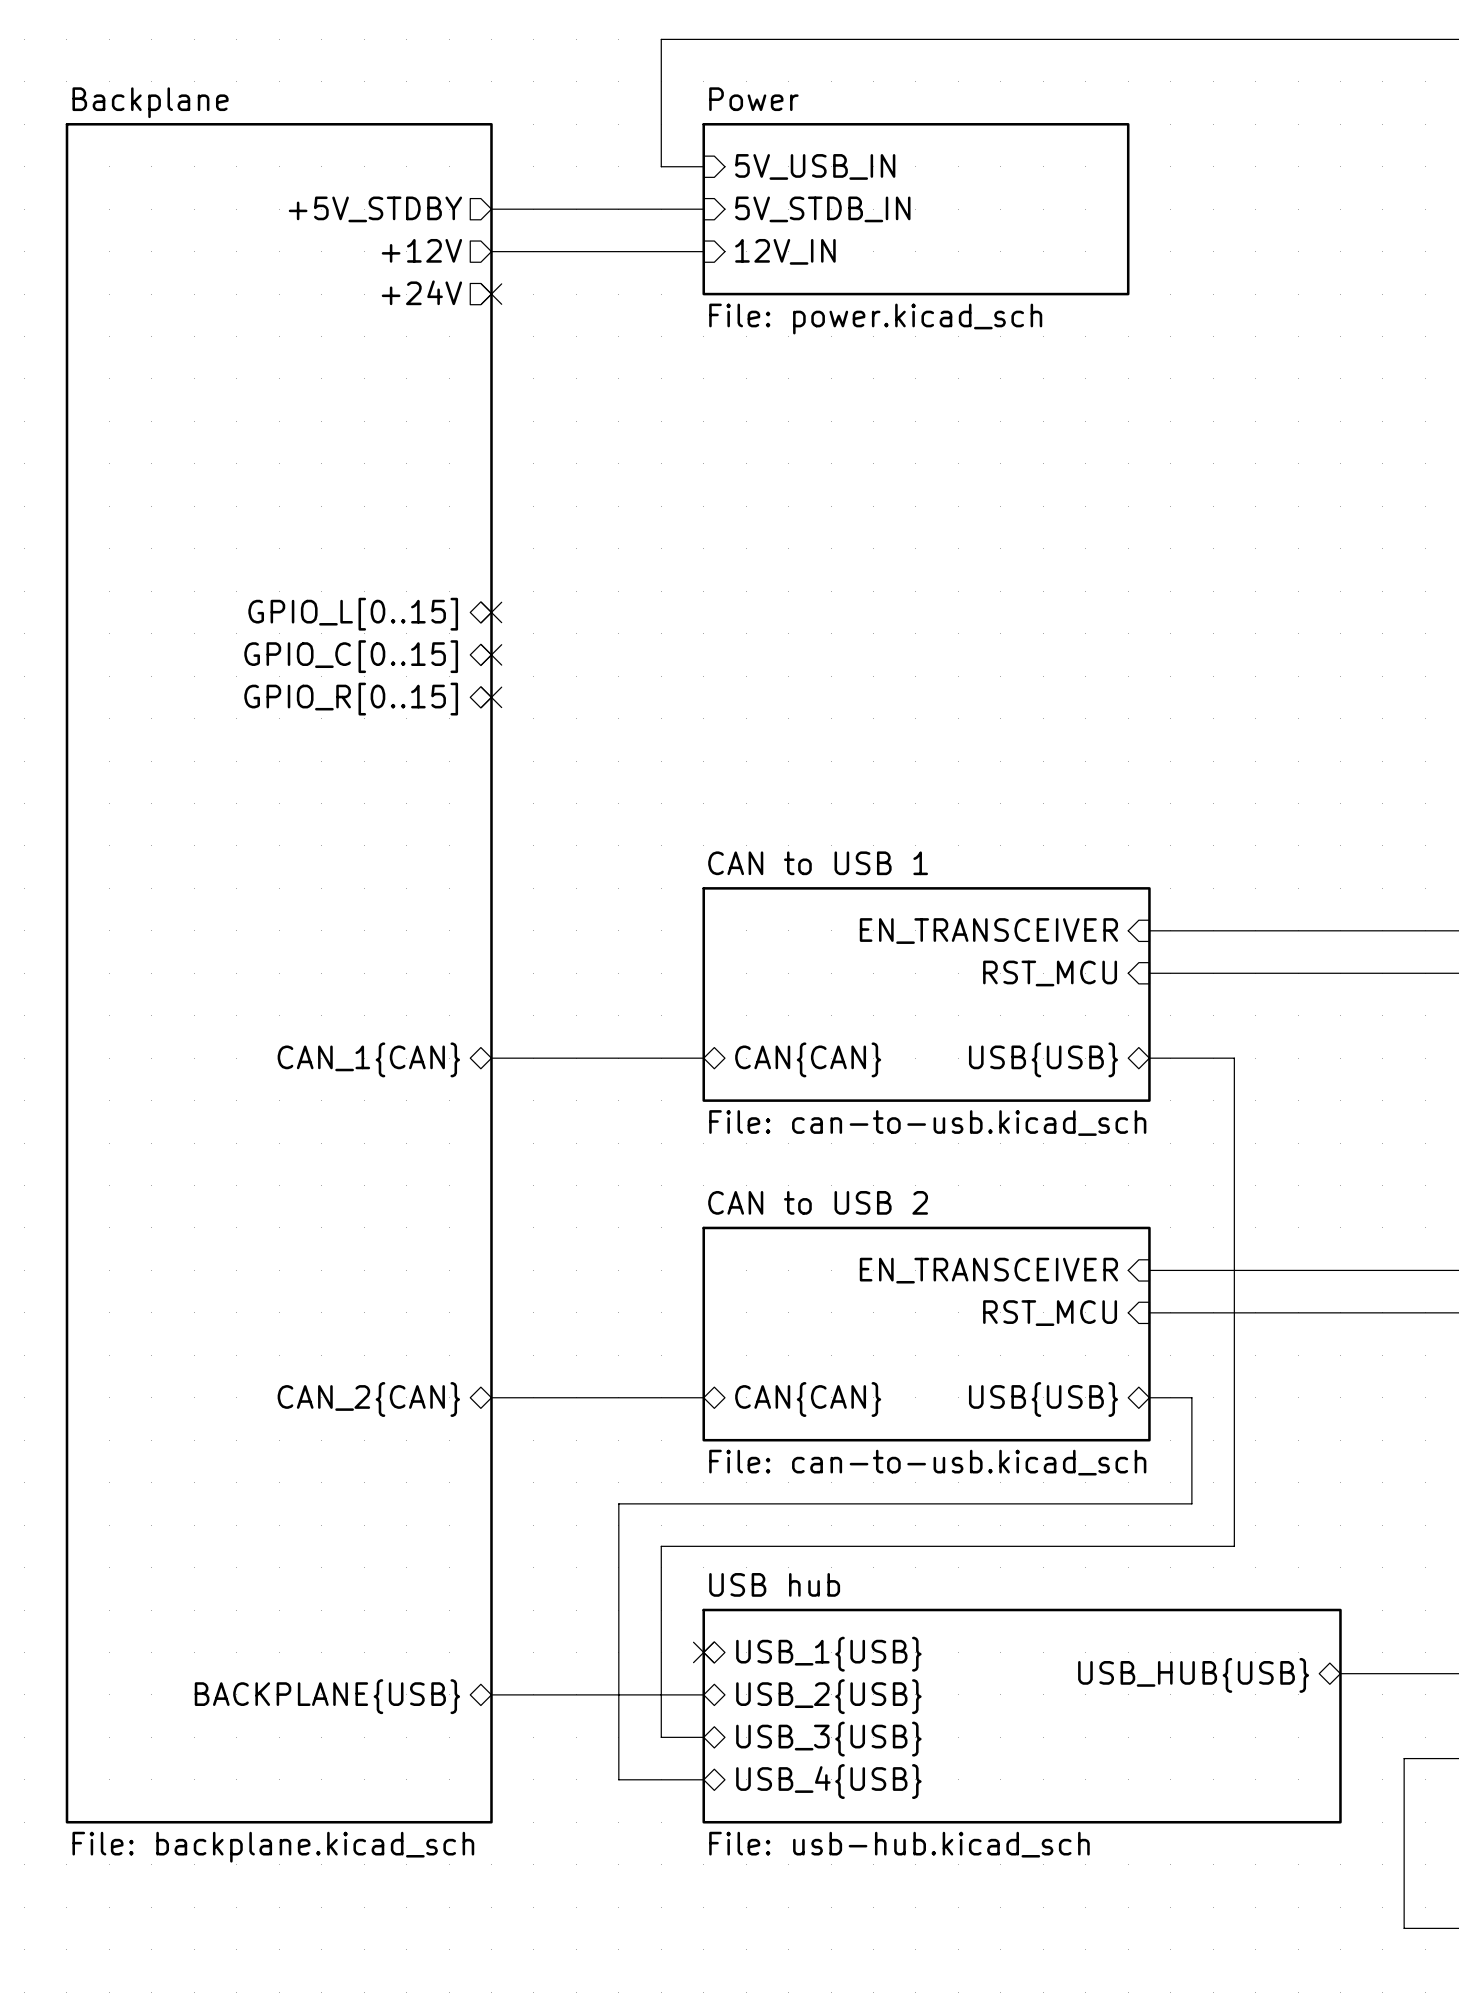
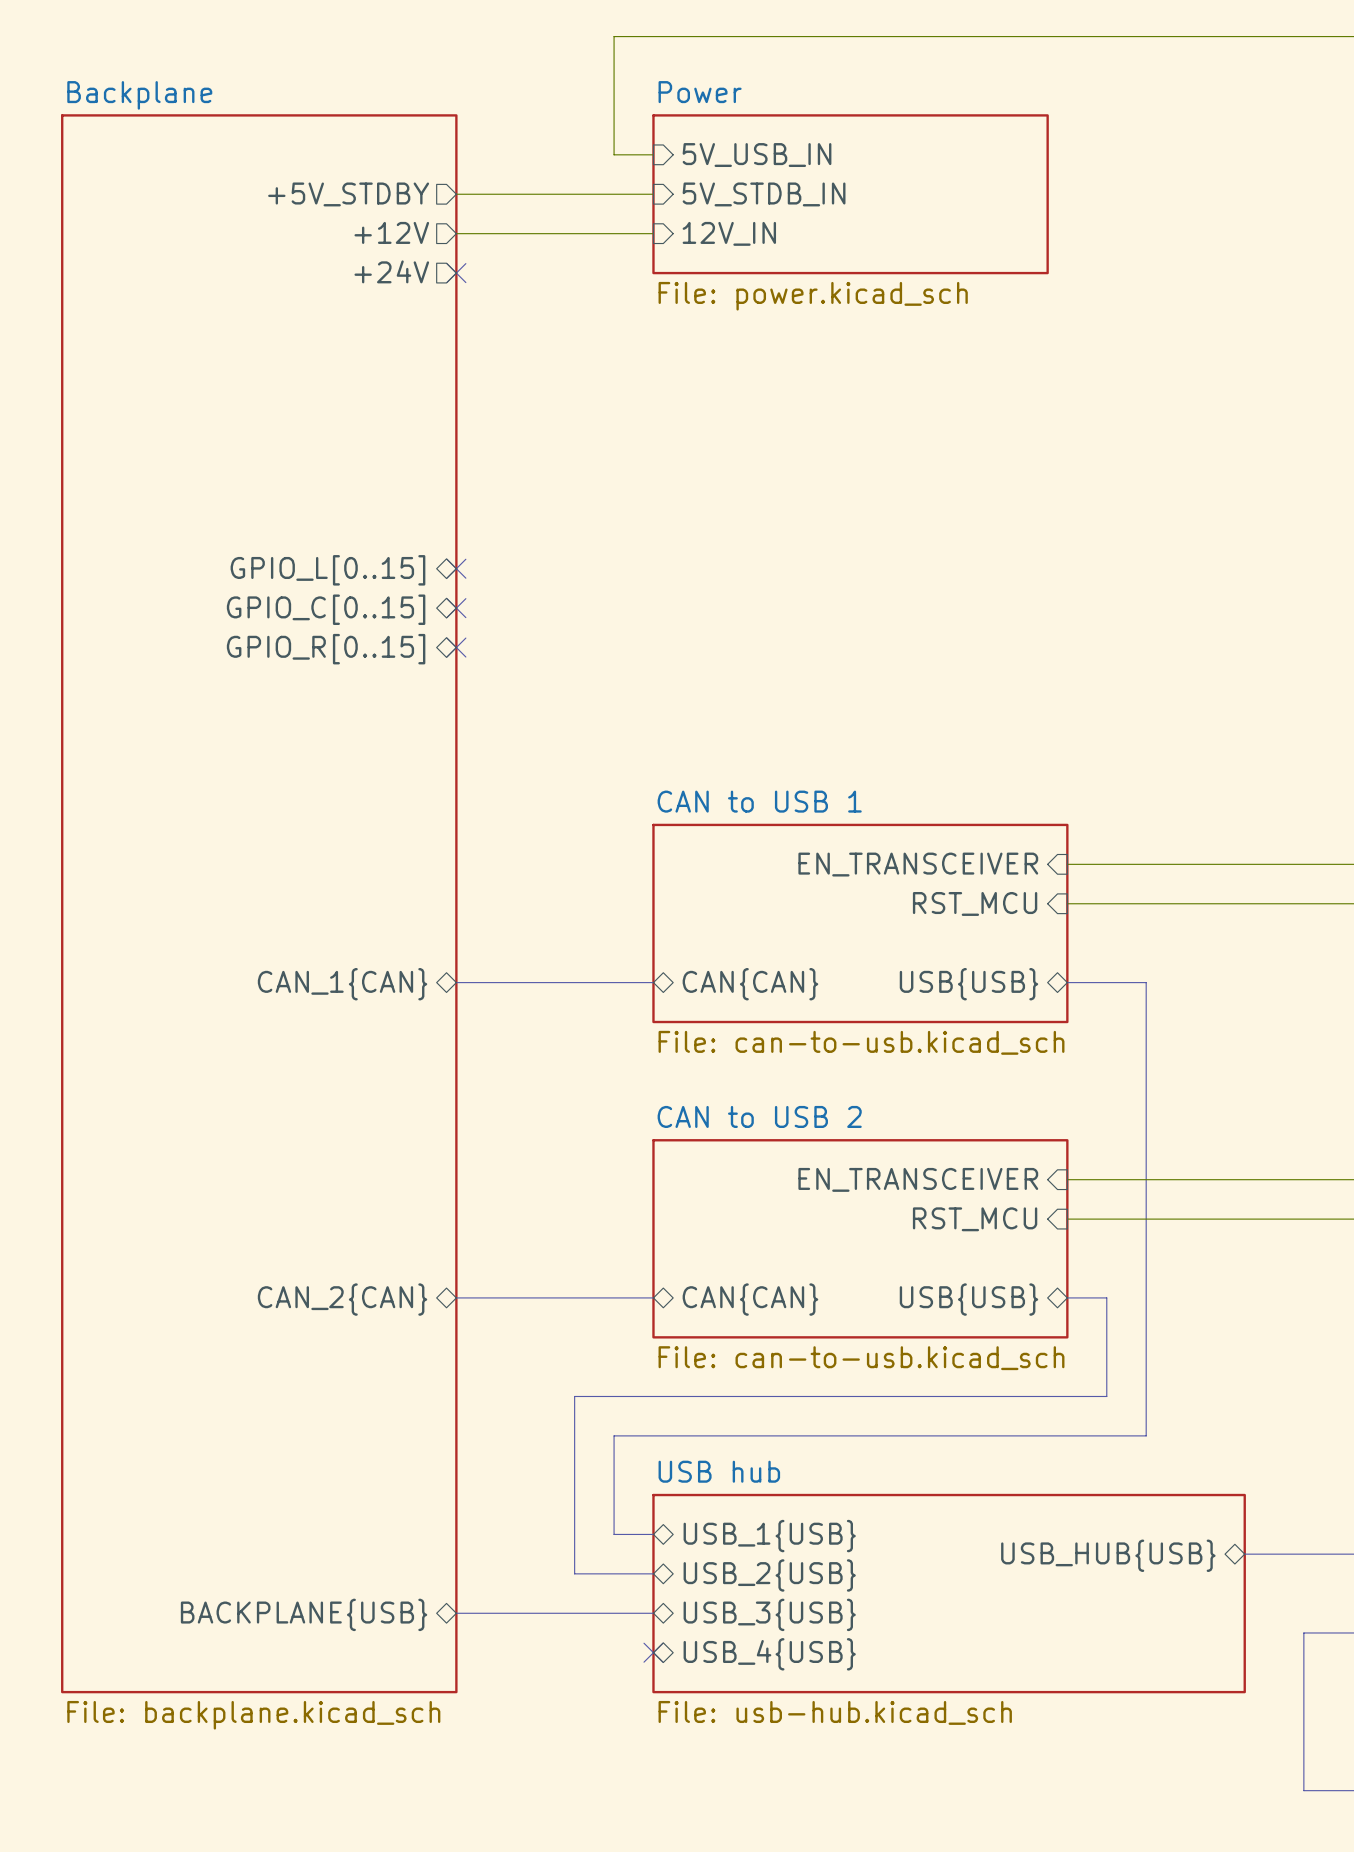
bus: (661, 1652) (661, 1737) -> (614, 1534) (653, 1534)
no-connect mark: (703, 1652) -> none
bus: (491, 1694) (618, 1694) (618, 1779) (703, 1779) -> none
sheet pin position: BACKPLANE{USB} (327, 1696) -> BACKPLANE{USB} (304, 1614)
bus: none -> (456, 1613) (614, 1613)
no-connect mark: none -> (653, 1652)

